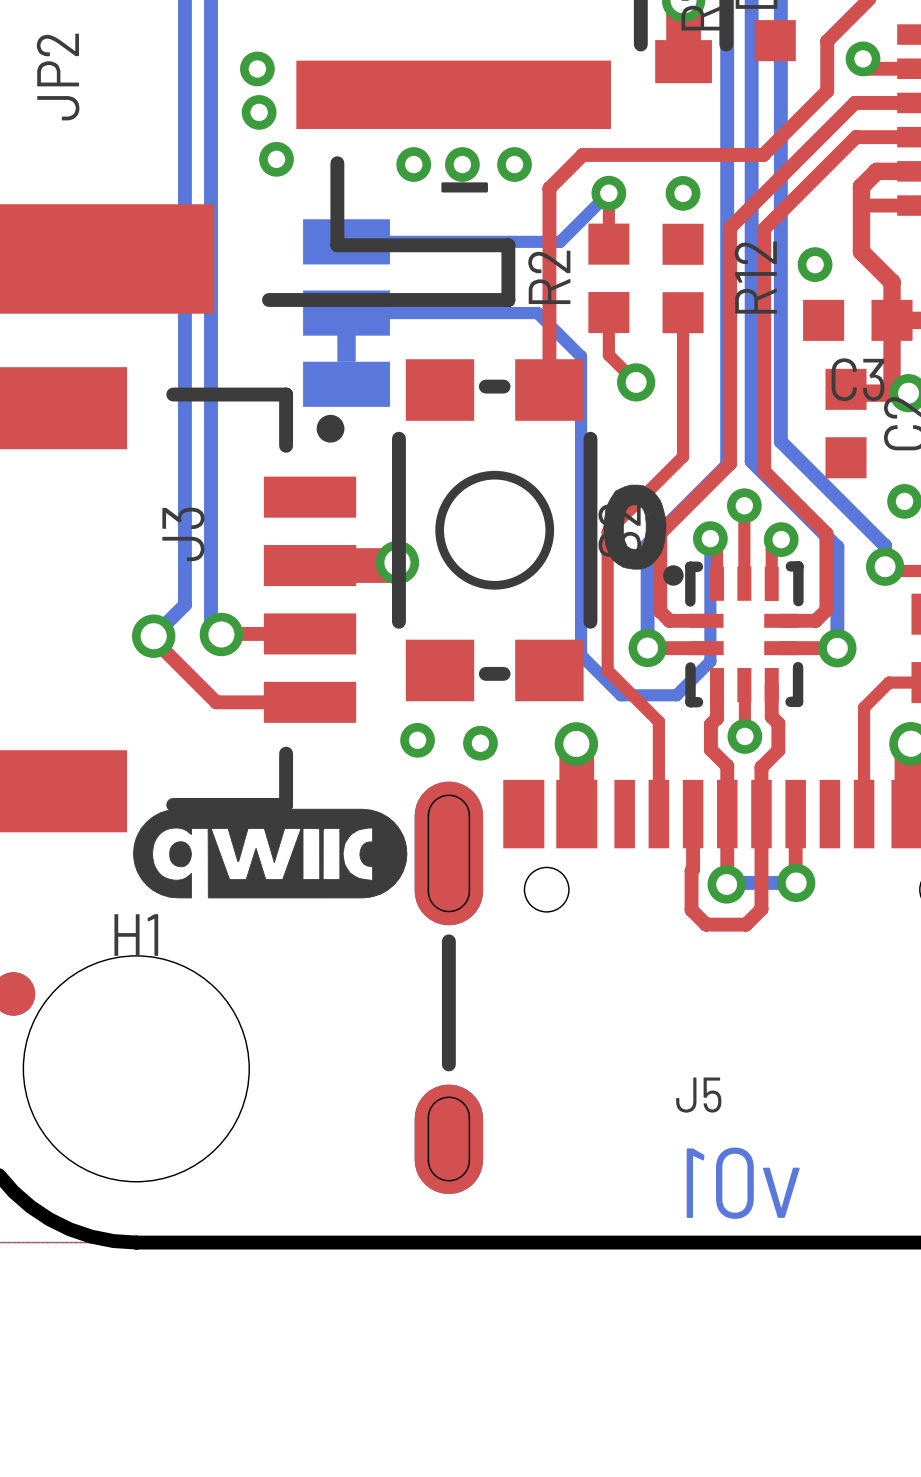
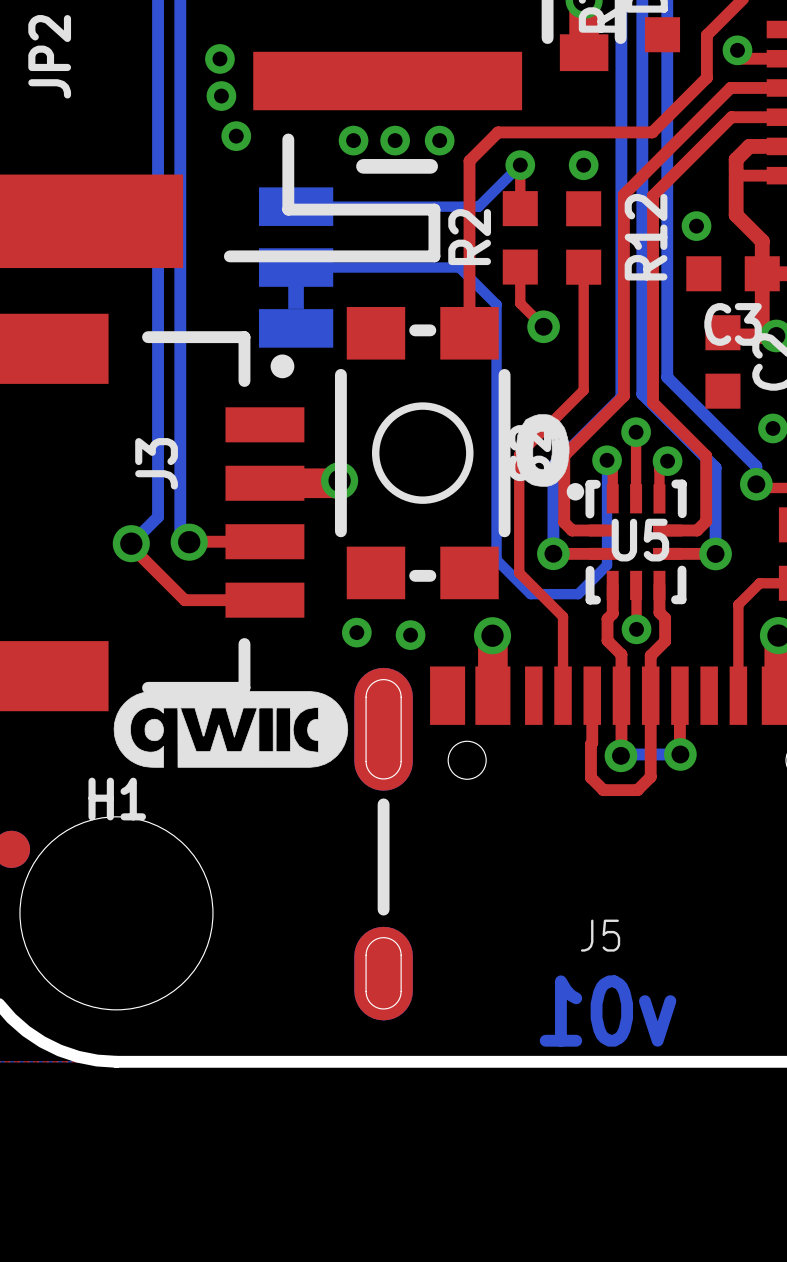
U5 name: none -> U5 (640, 540)

